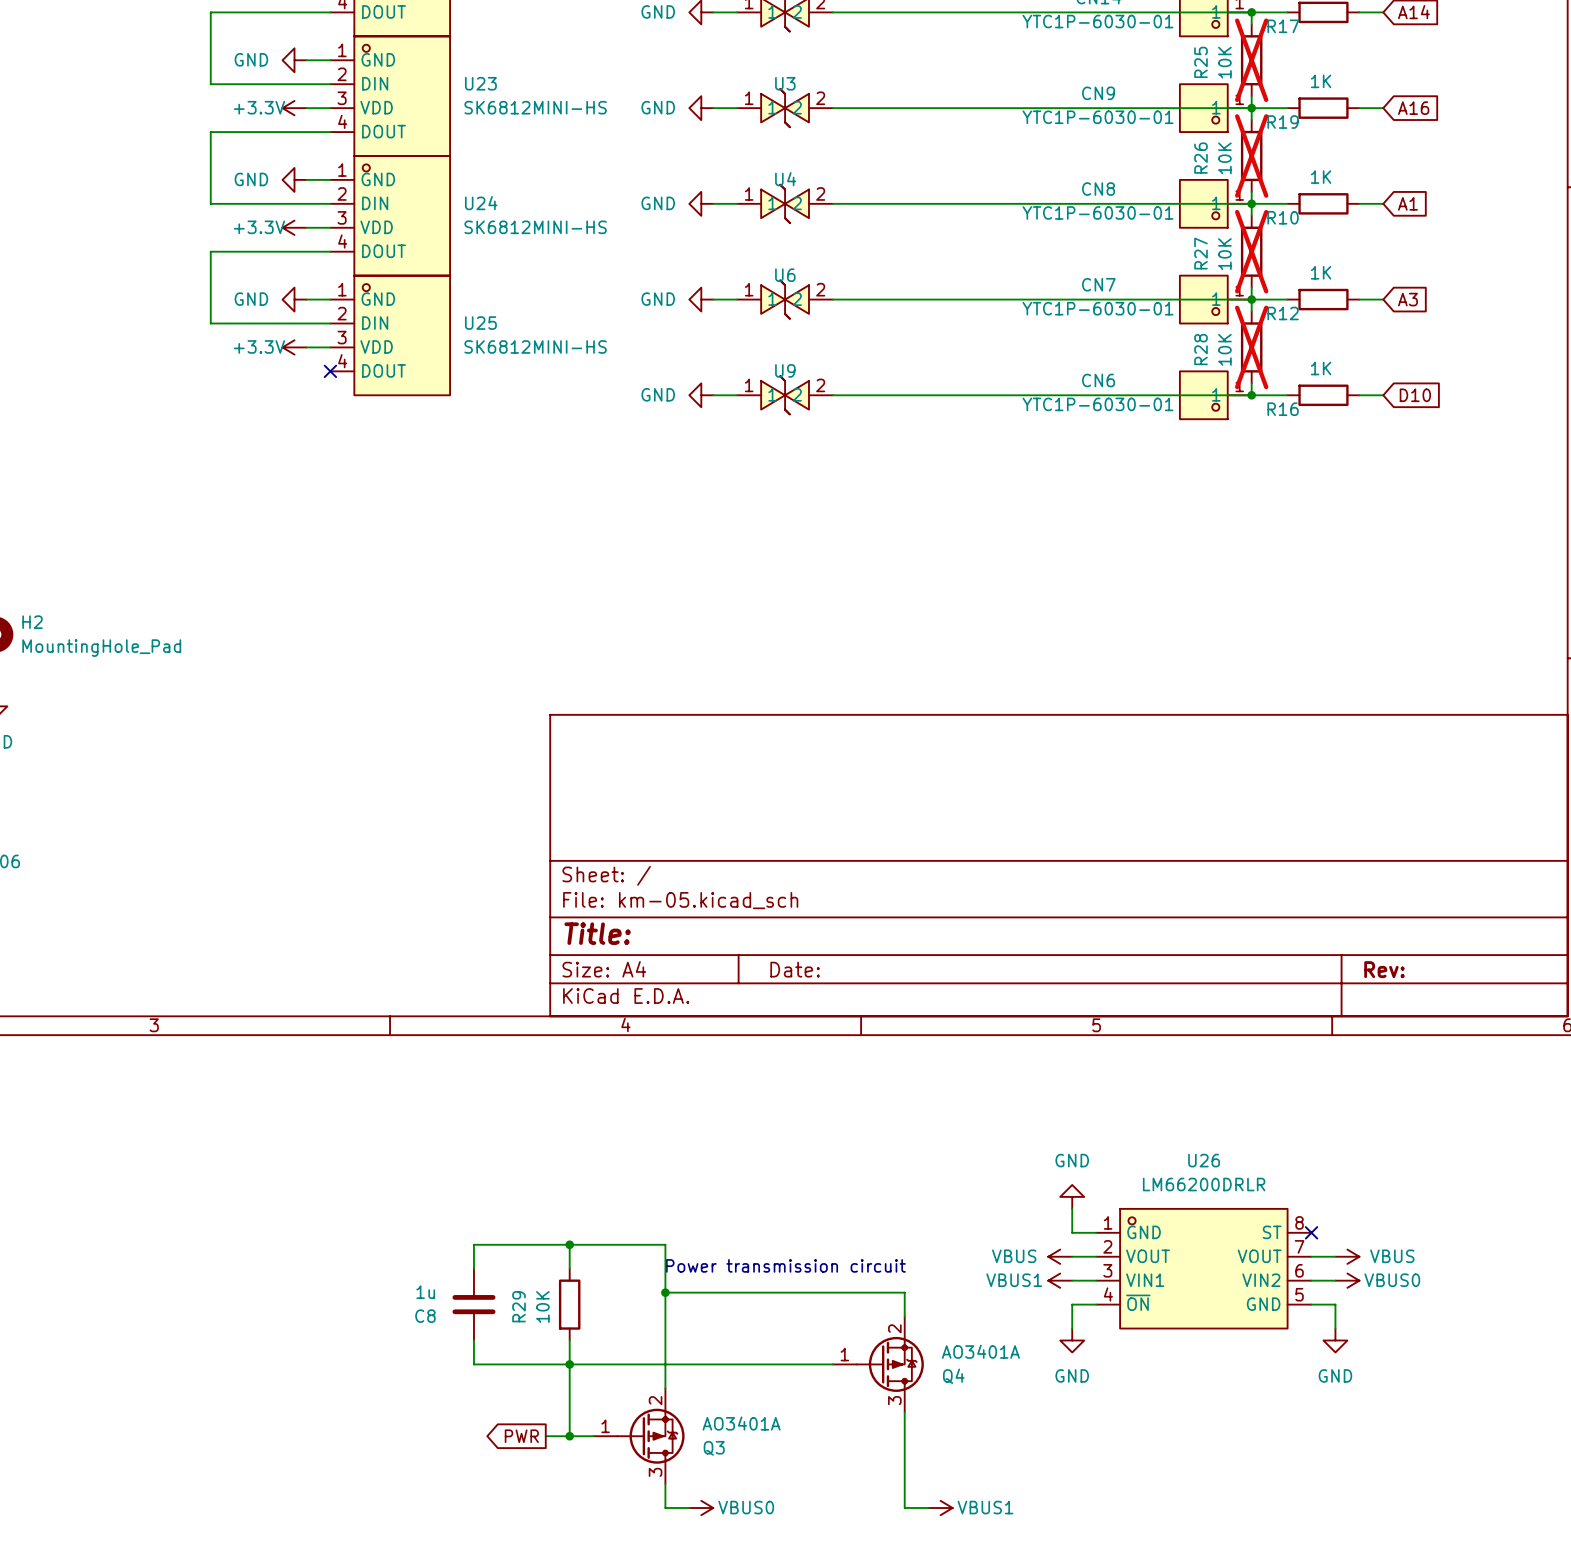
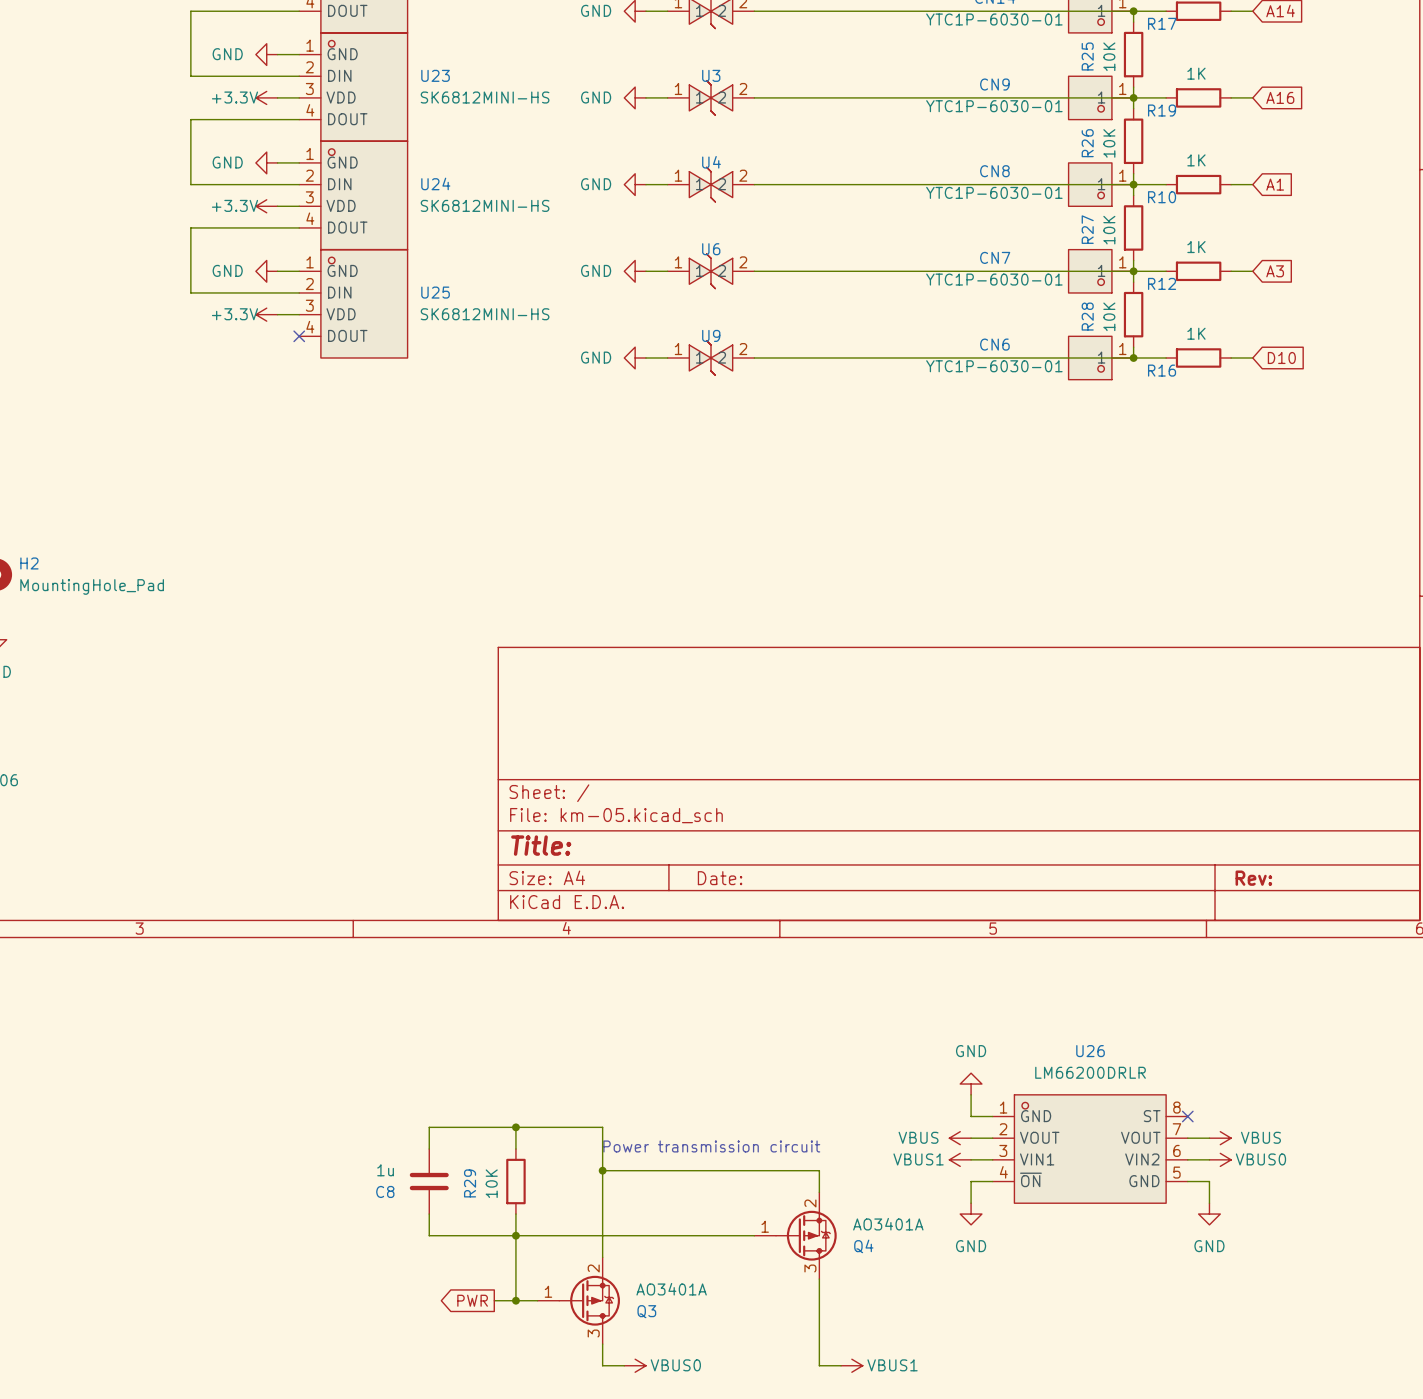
R25 do-not-place cross: (1251, 60) -> none
R26 do-not-place cross: (1251, 155) -> none
R27 do-not-place cross: (1251, 251) -> none
R28 do-not-place cross: (1251, 347) -> none

